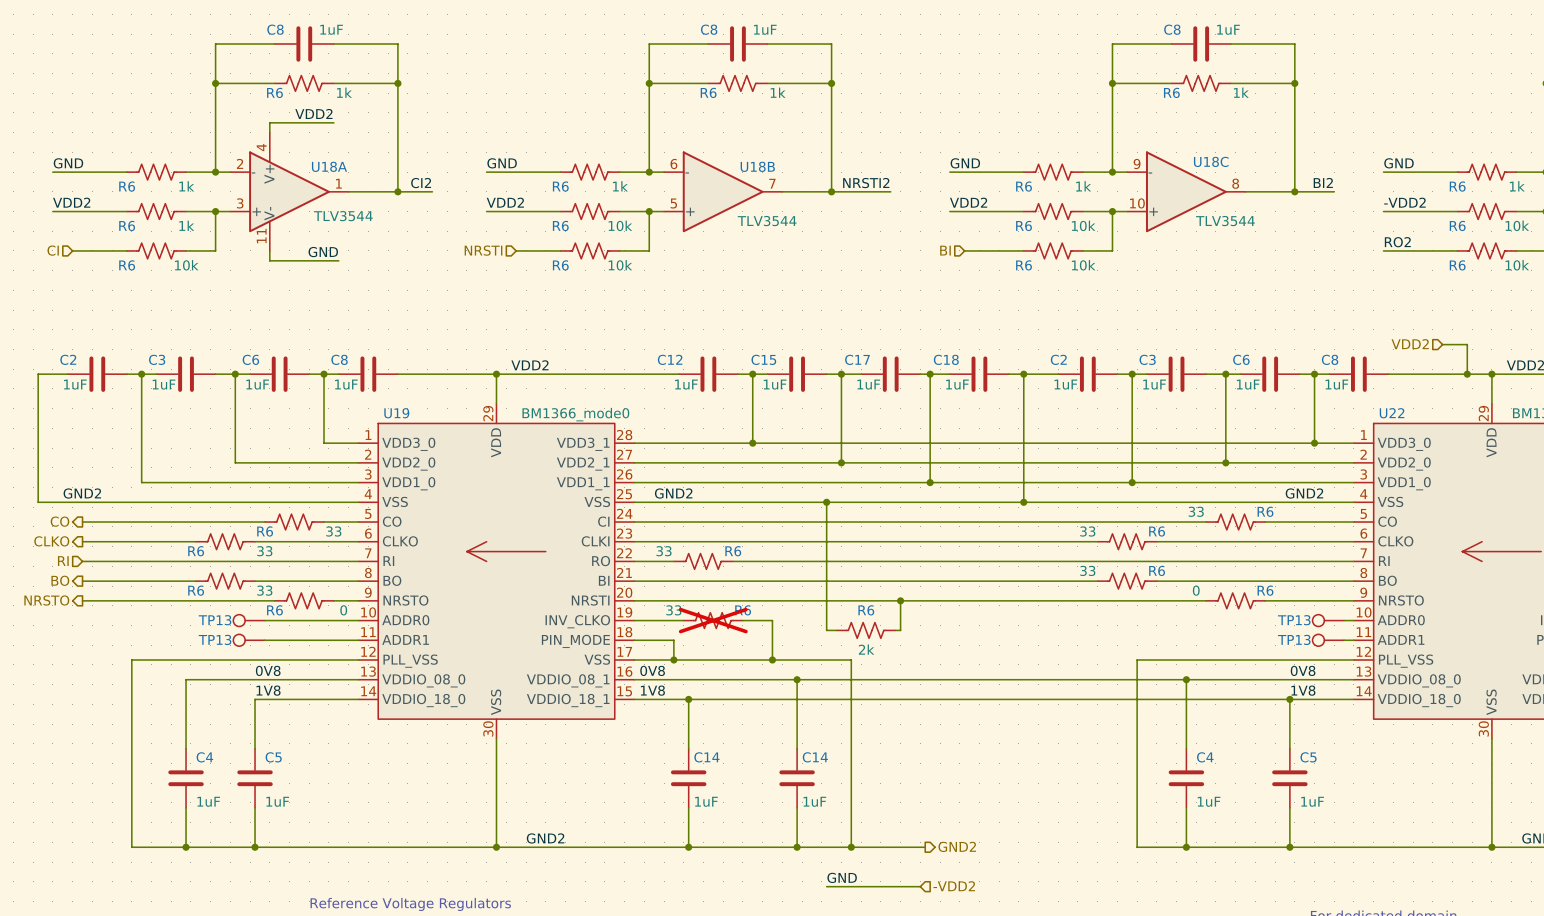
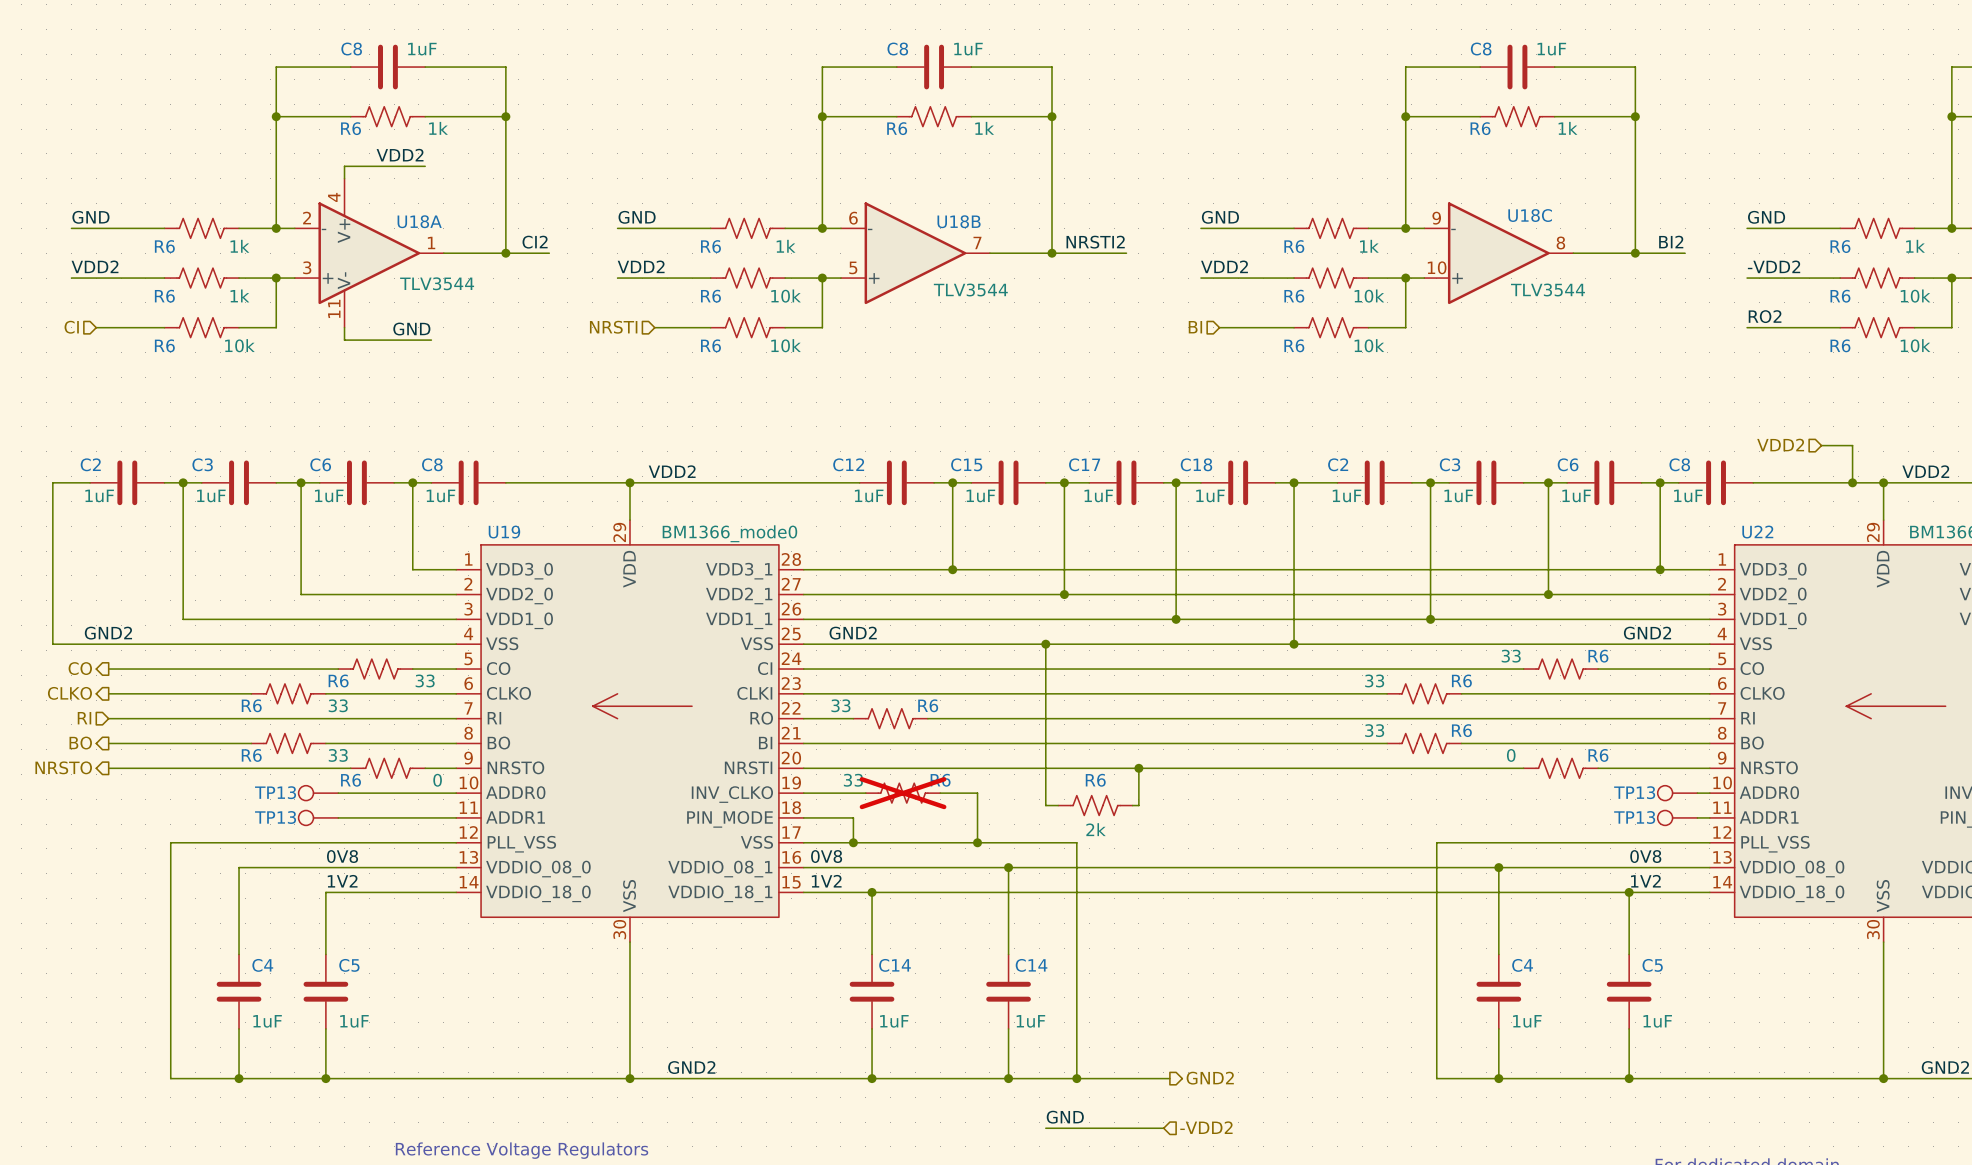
label: 1V8 (268, 690) -> 1V2 (342, 881)
label: 1V8 (652, 690) -> 1V2 (826, 881)
label: 1V8 (1303, 690) -> 1V2 (1645, 881)

